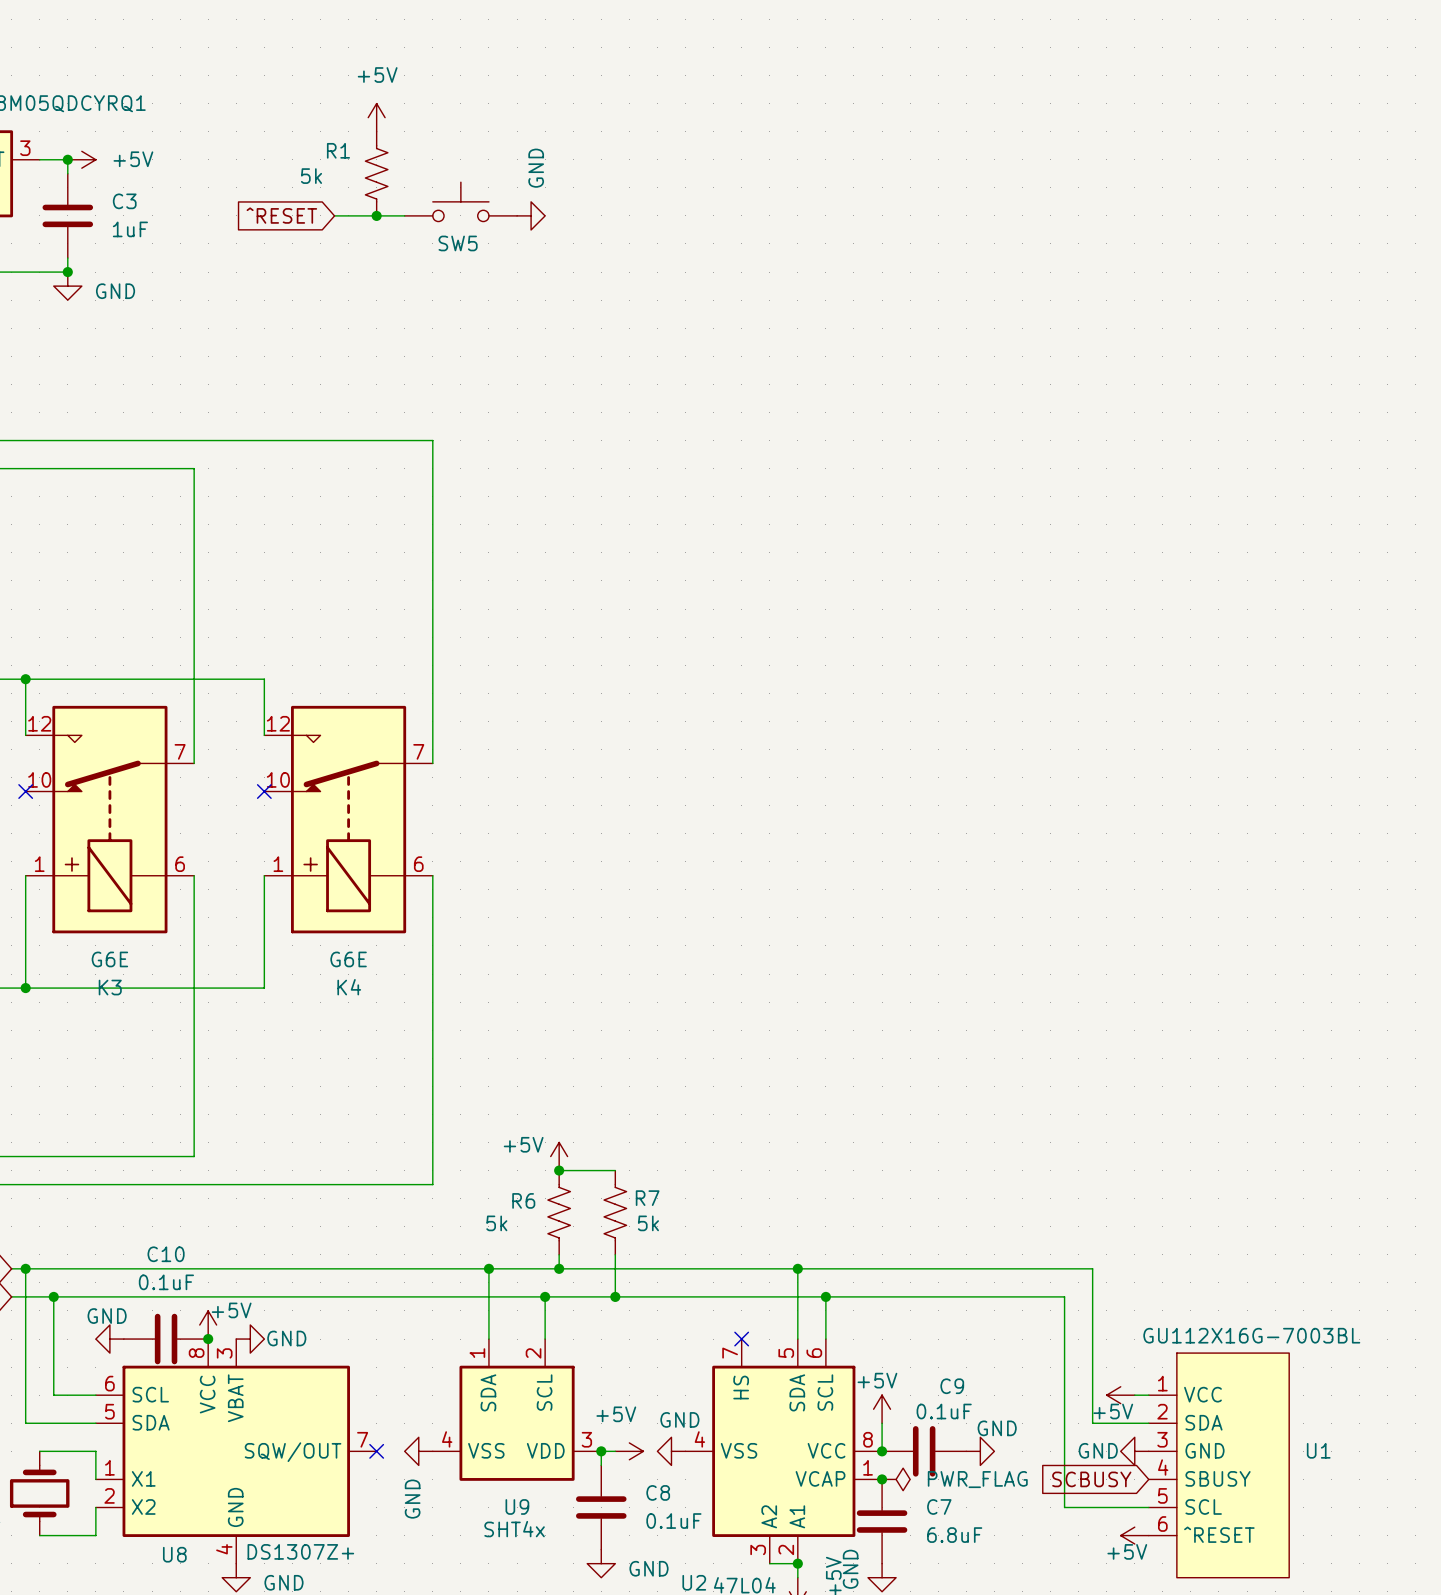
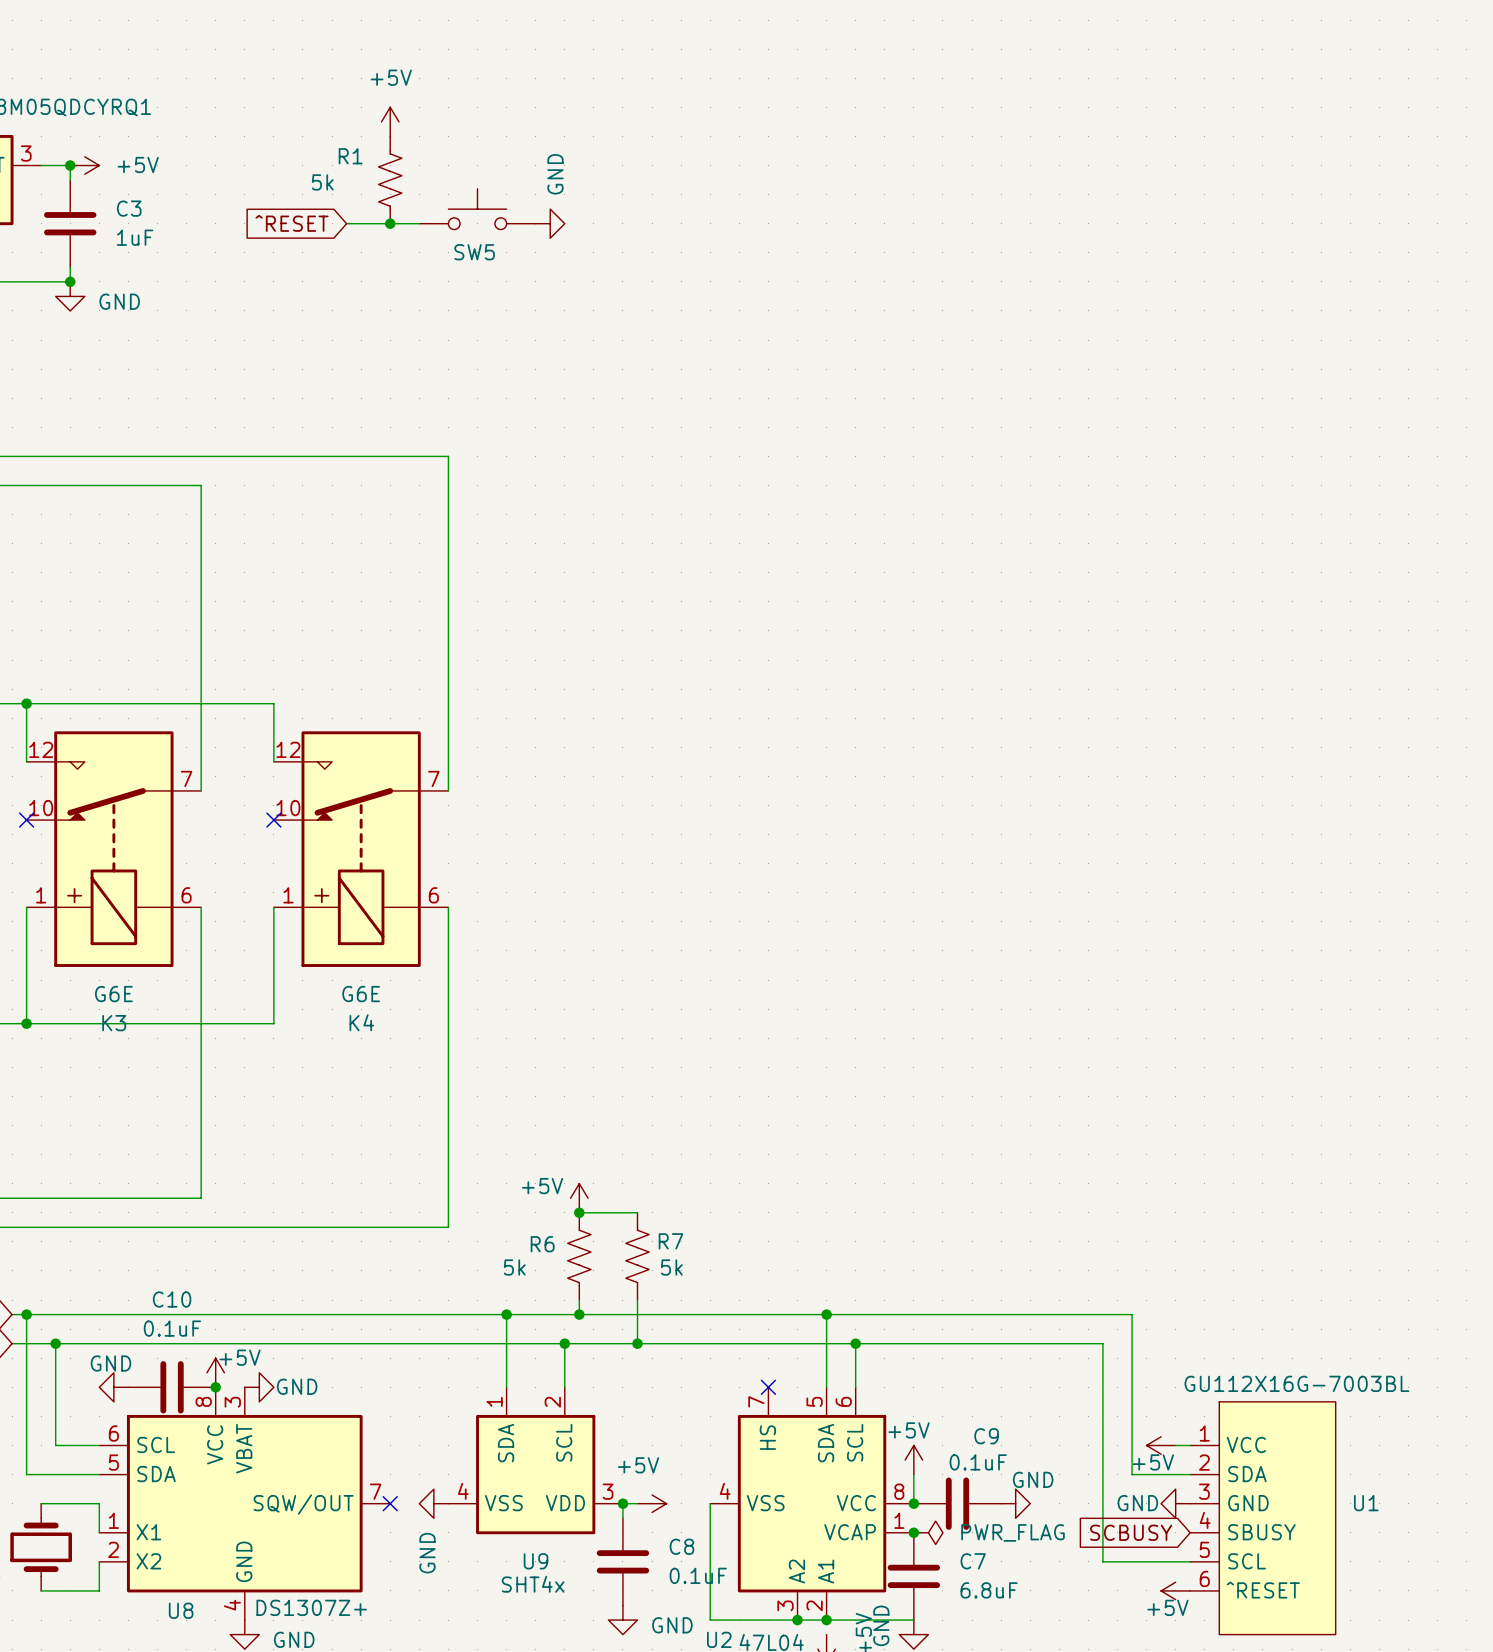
power symbol: GND (671, 1451) -> none
wire: none -> (710, 1503) (710, 1620) (797, 1620)
junction: none -> (797, 1620)
wire: (797, 1563) (797, 1577) -> (826, 1620) (913, 1620)

